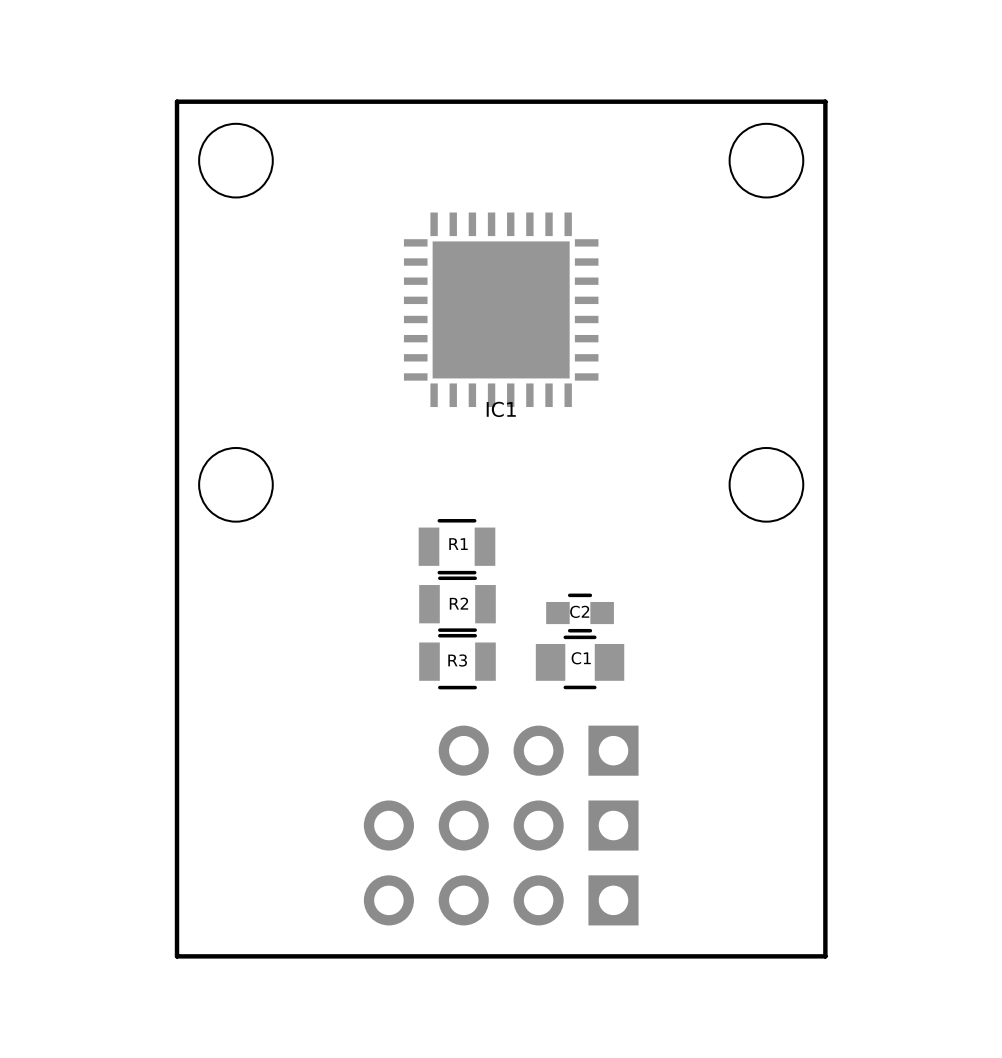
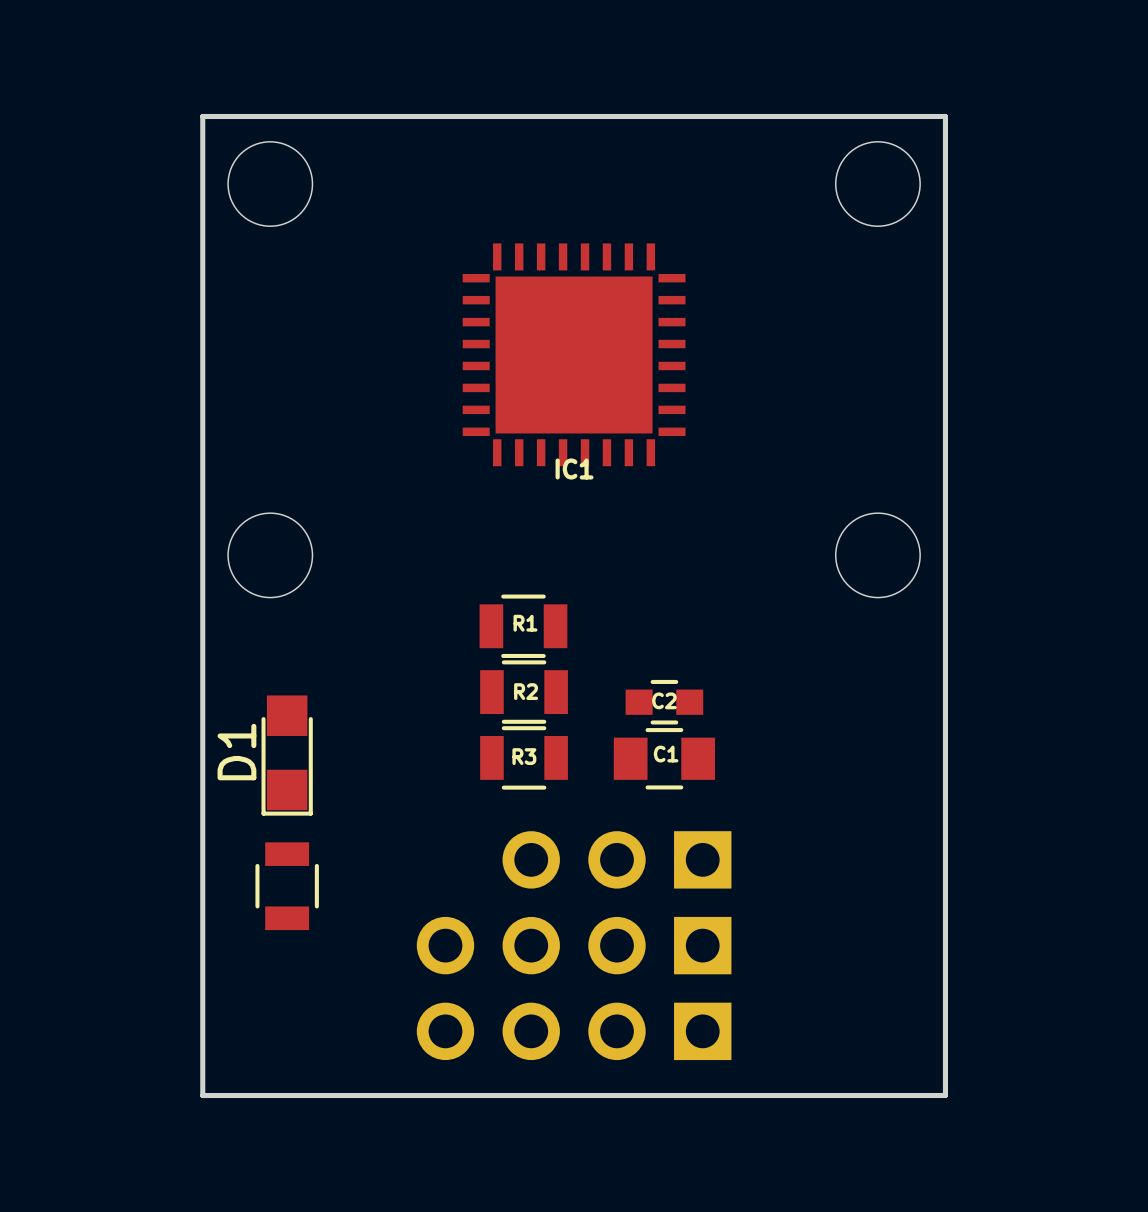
D1: none -> (287, 755)
part: none -> (287, 886)

